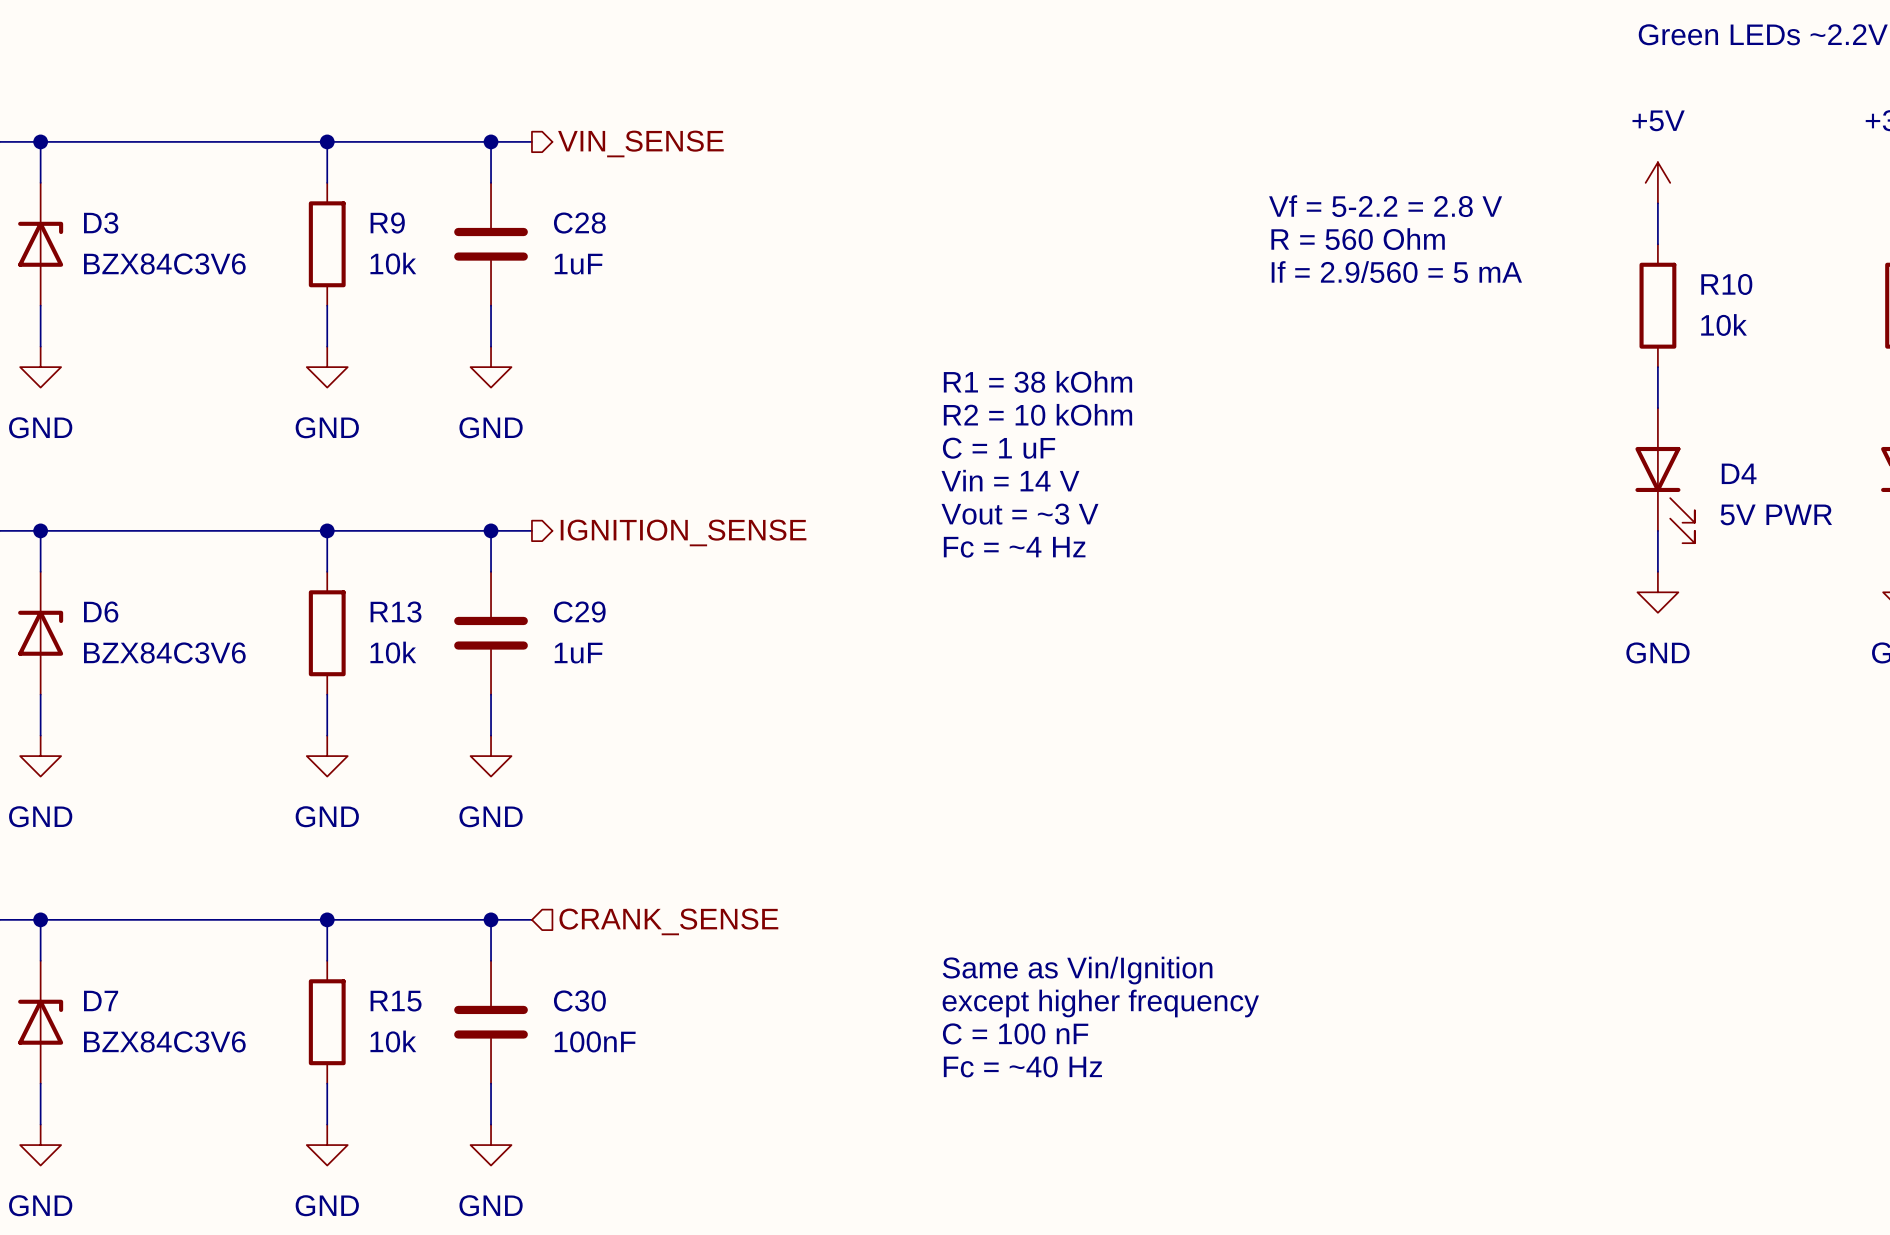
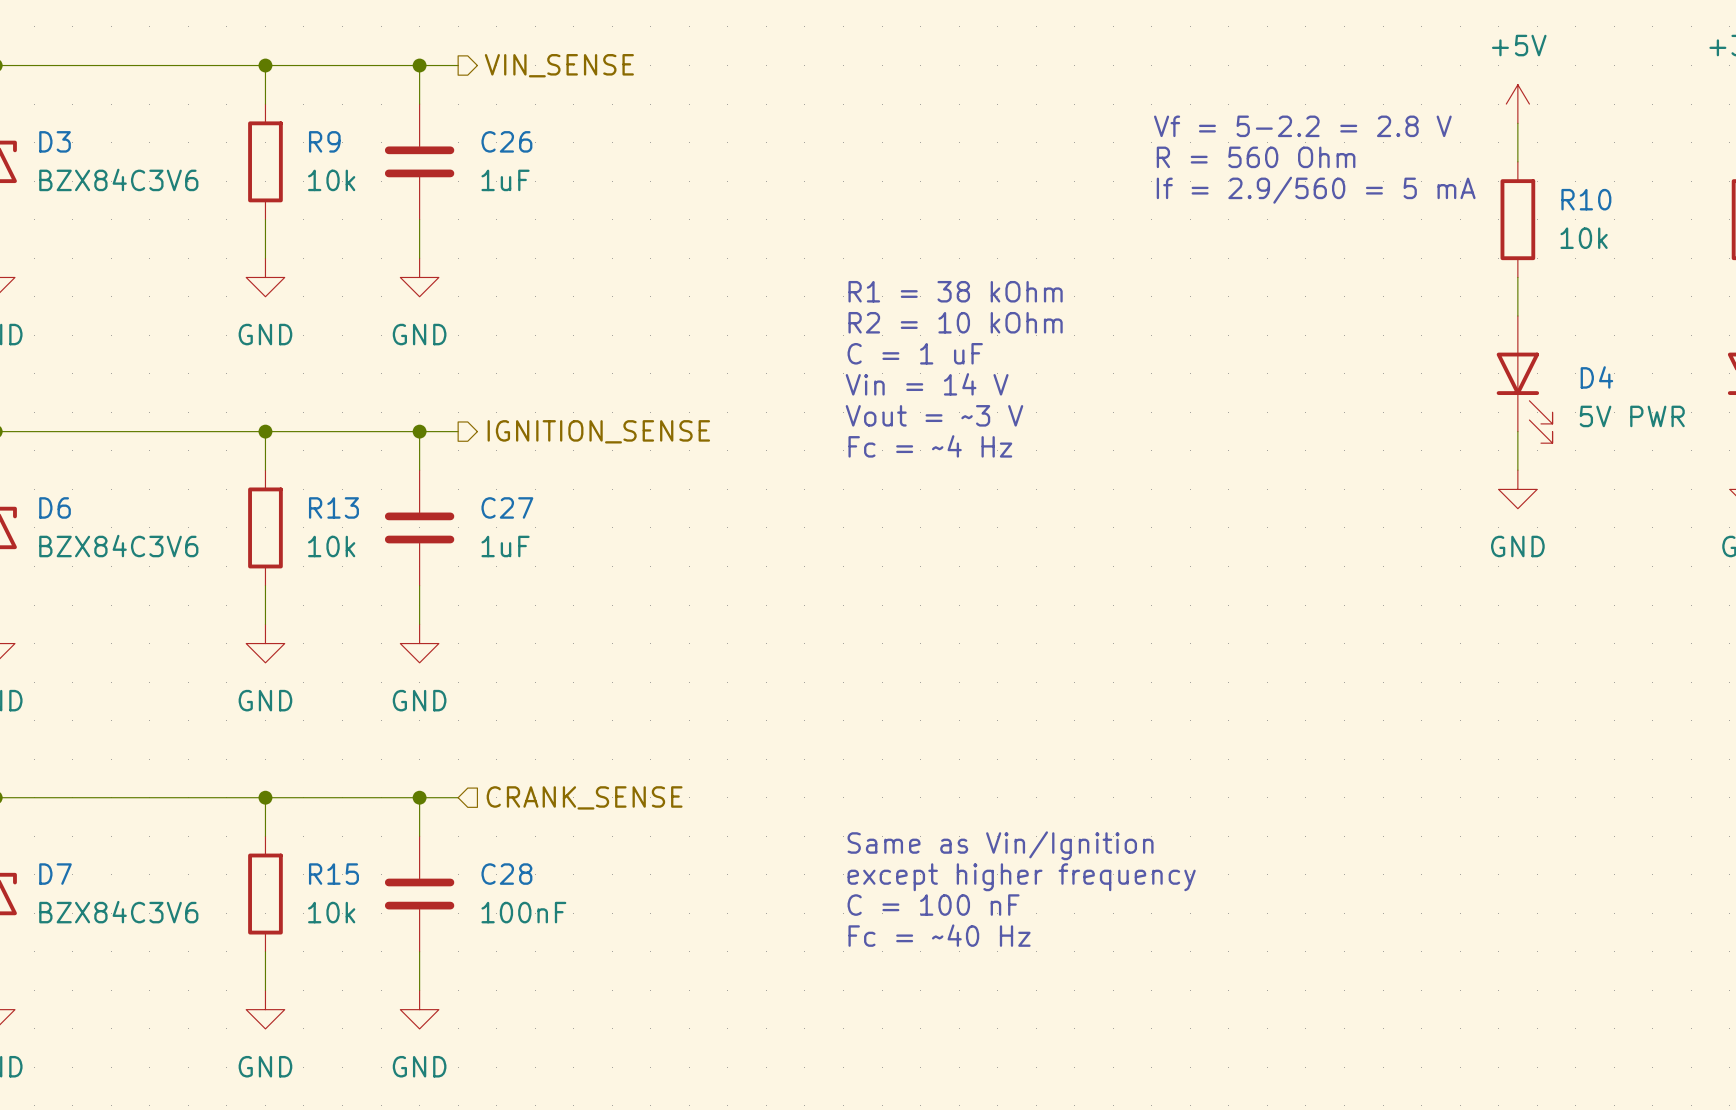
C28 name: C28 (579, 223) -> C26 (506, 141)
C29 name: C29 (579, 612) -> C27 (507, 507)
C30 name: C30 (579, 1000) -> C28 (506, 874)

